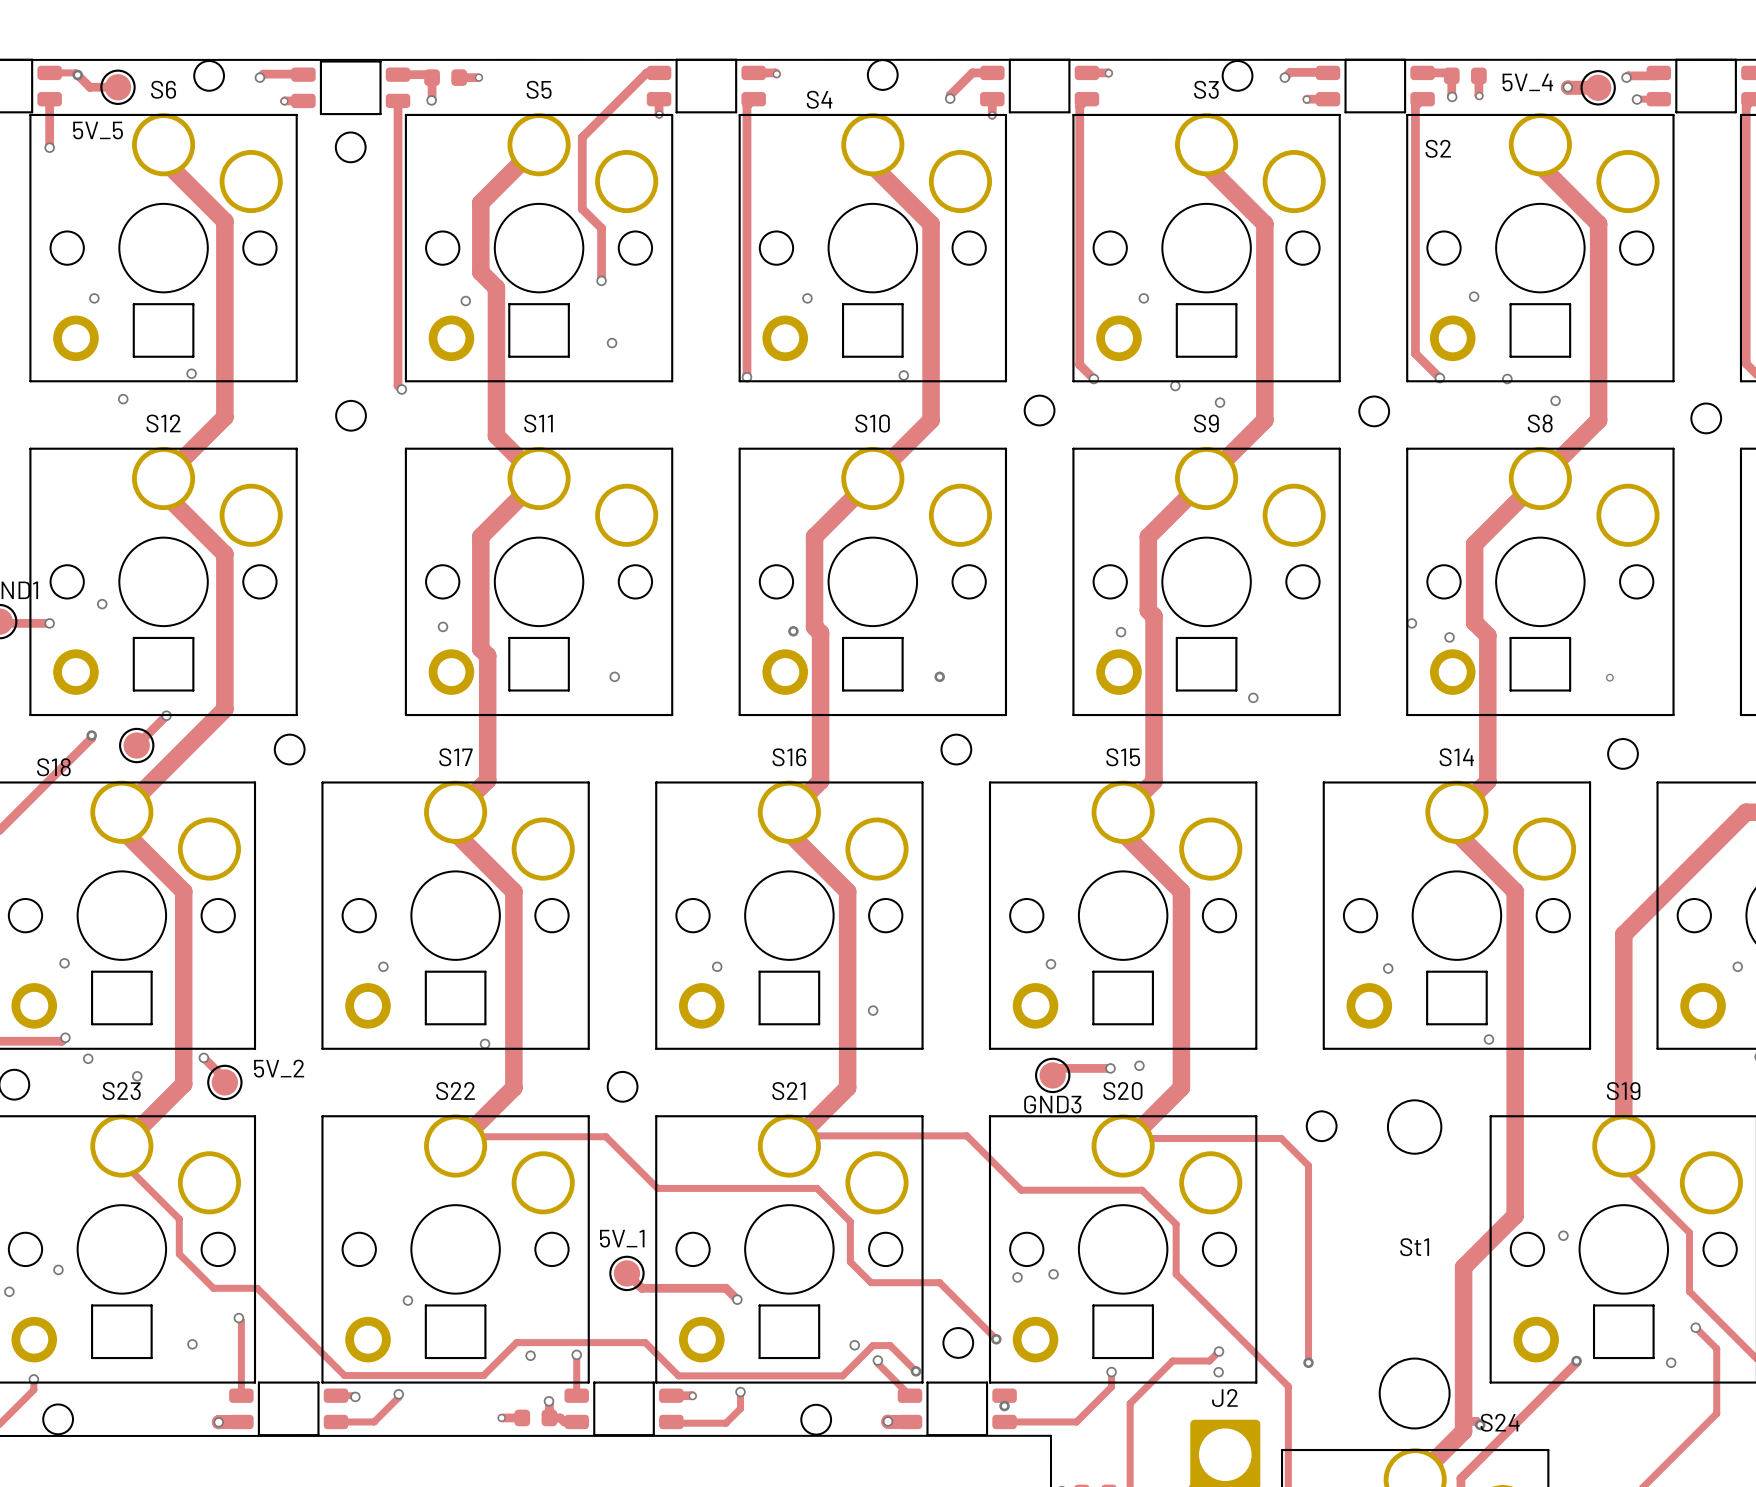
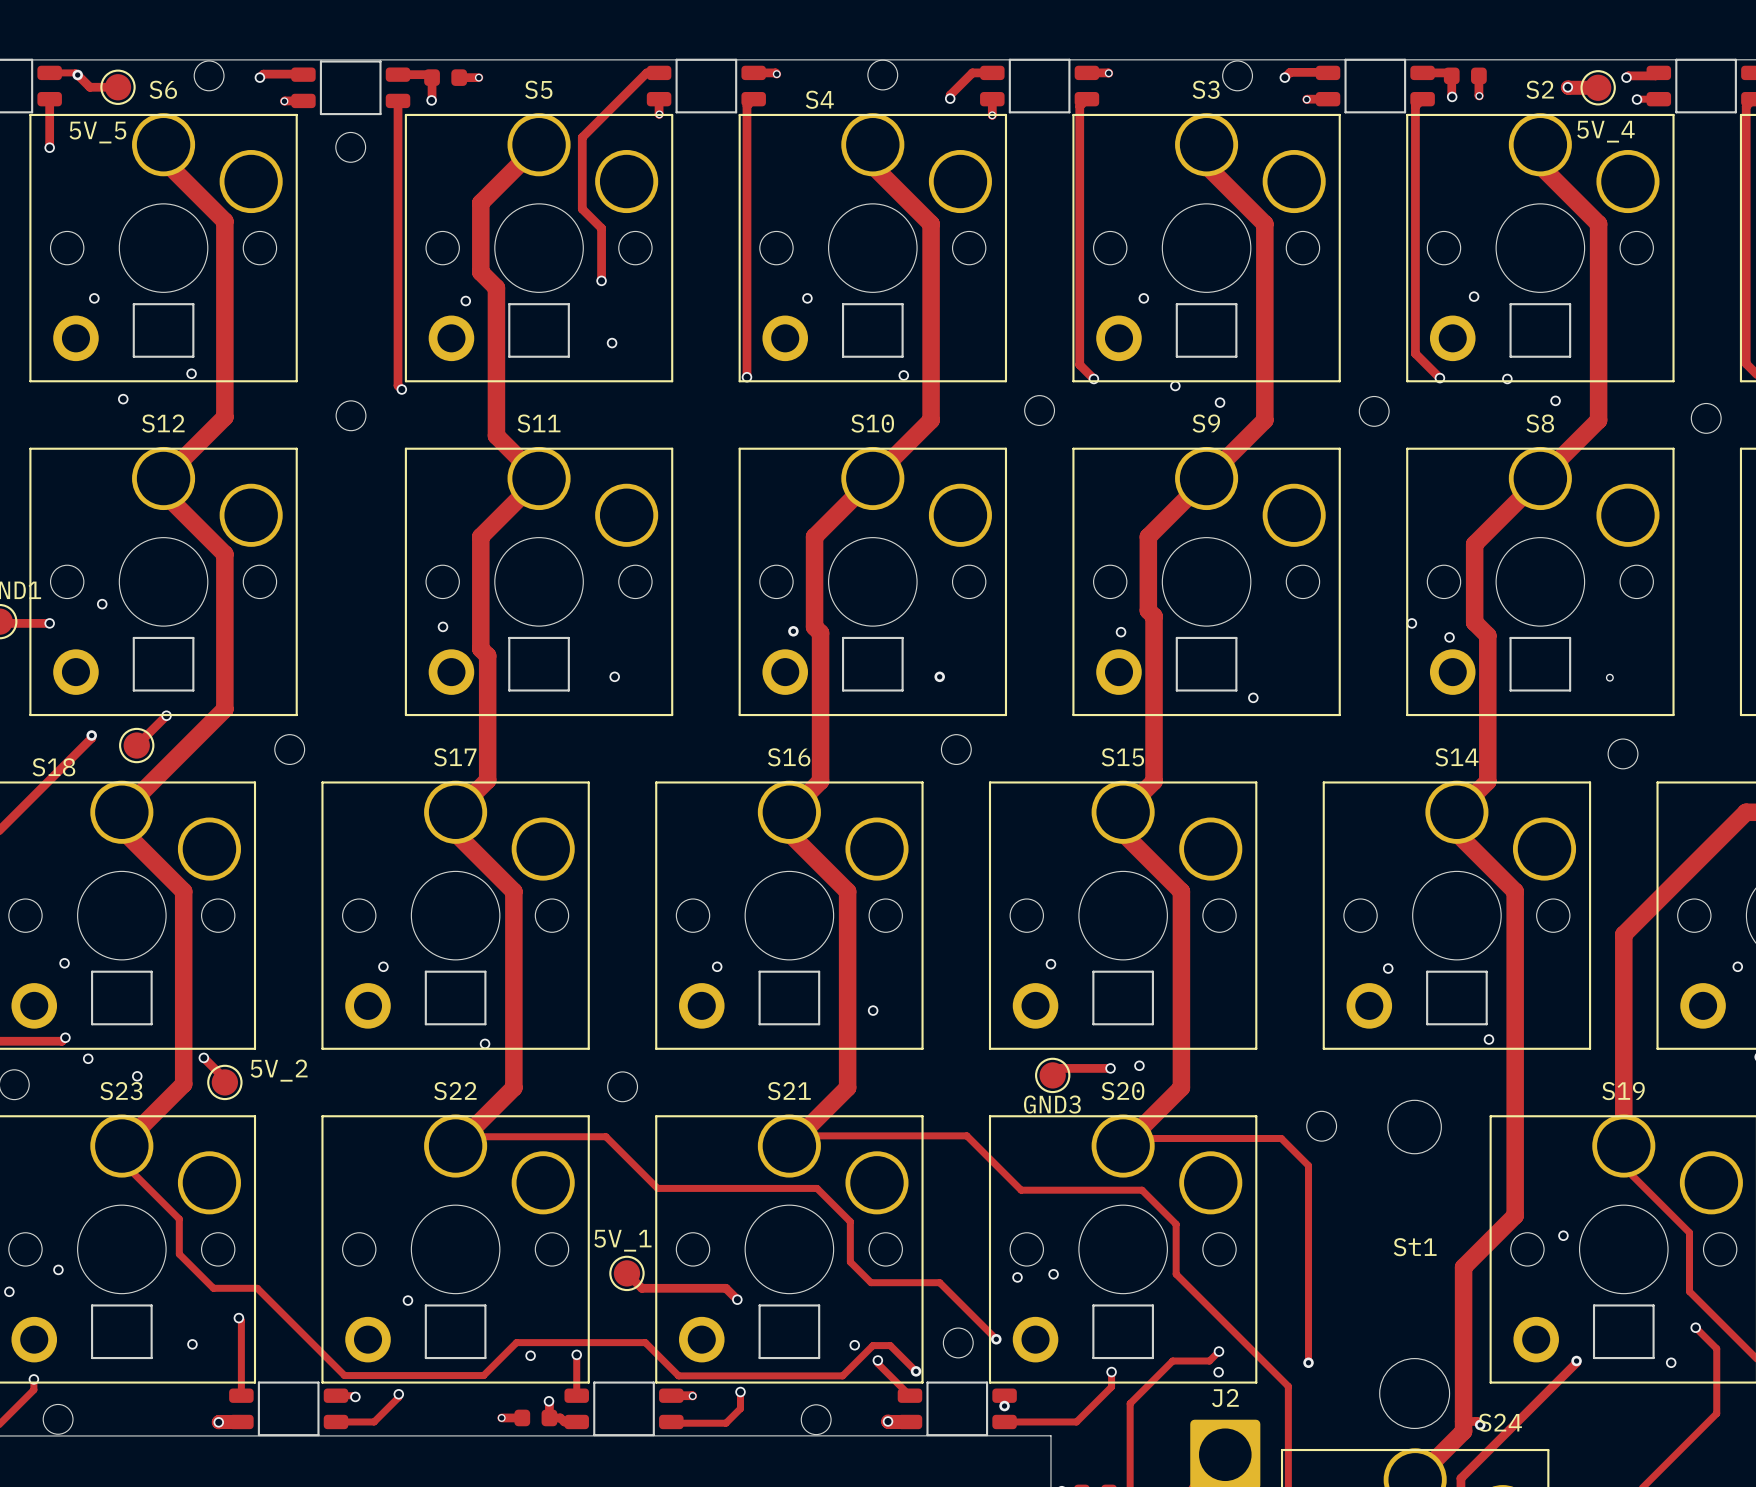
5V_4 name position: 5V_4 (1527, 82) -> 5V_4 (1605, 131)
S2 name position: S2 (1438, 148) -> S2 (1540, 89)

